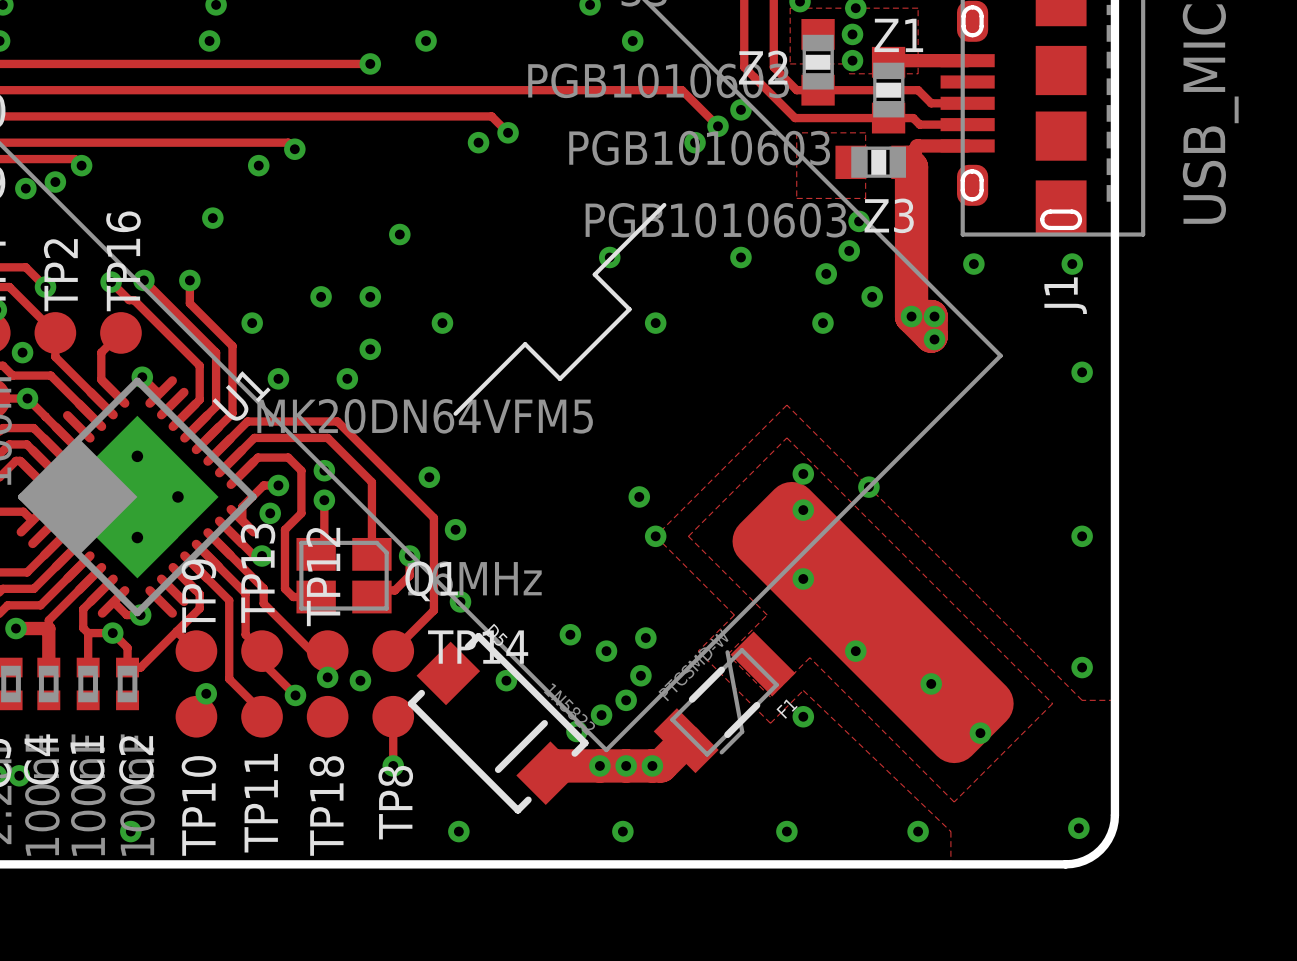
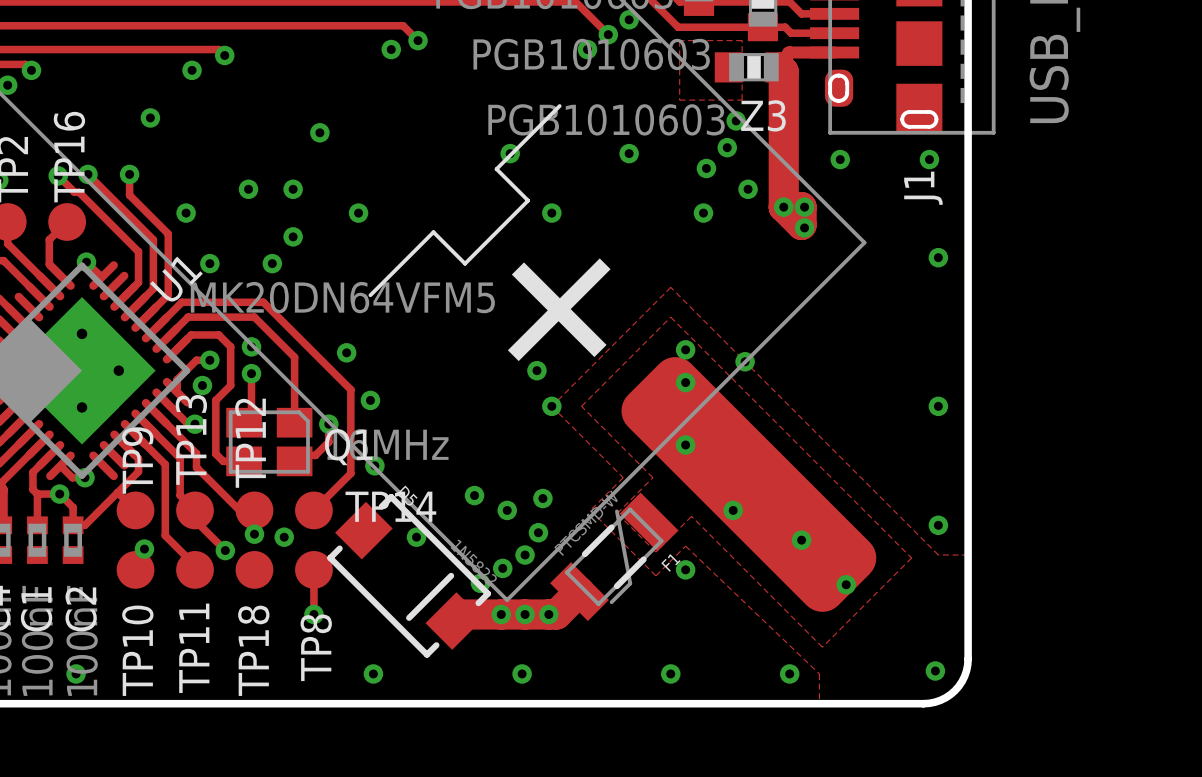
text: none -> + (559, 309)

